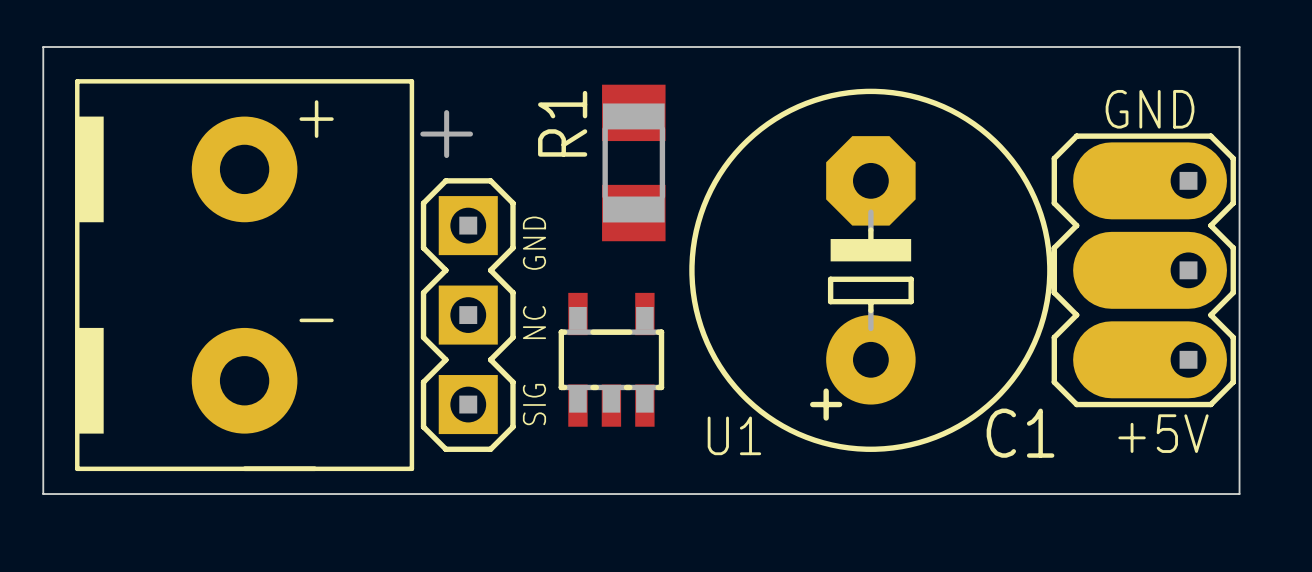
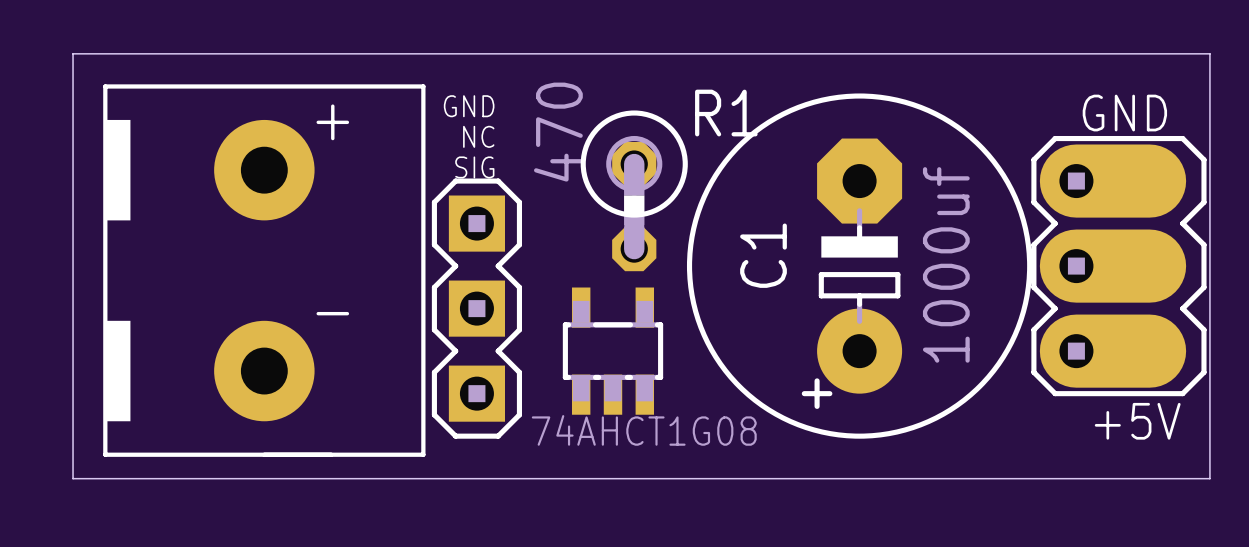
R1 footprint: [602, 84, 666, 242] -> [580, 110, 688, 272]
R1 name position: R1 (562, 123) -> R1 (726, 113)
R1 value: none -> 470 (558, 132)
part footprint: [1051, 133, 1236, 408] -> [1031, 135, 1207, 397]
text: + (446, 134) -> none
text rotation: 0° (534, 243) -> 90° clockwise (469, 106)
text position: GND (534, 243) -> GND (469, 106)
C1 value: none -> 1000uf (946, 264)
text rotation: 0° (534, 322) -> 90° clockwise (478, 136)
text position: NC (534, 322) -> NC (478, 136)
text rotation: 0° (534, 404) -> 90° clockwise (474, 167)
text position: SIG (534, 404) -> SIG (474, 167)
C1 name rotation: 0° (1020, 433) -> 90° counterclockwise (763, 255)
C1 name position: C1 (1020, 433) -> C1 (763, 255)
U1 name: U1 (734, 435) -> none
U1 value: none -> 74AHCT1G08 (644, 430)

